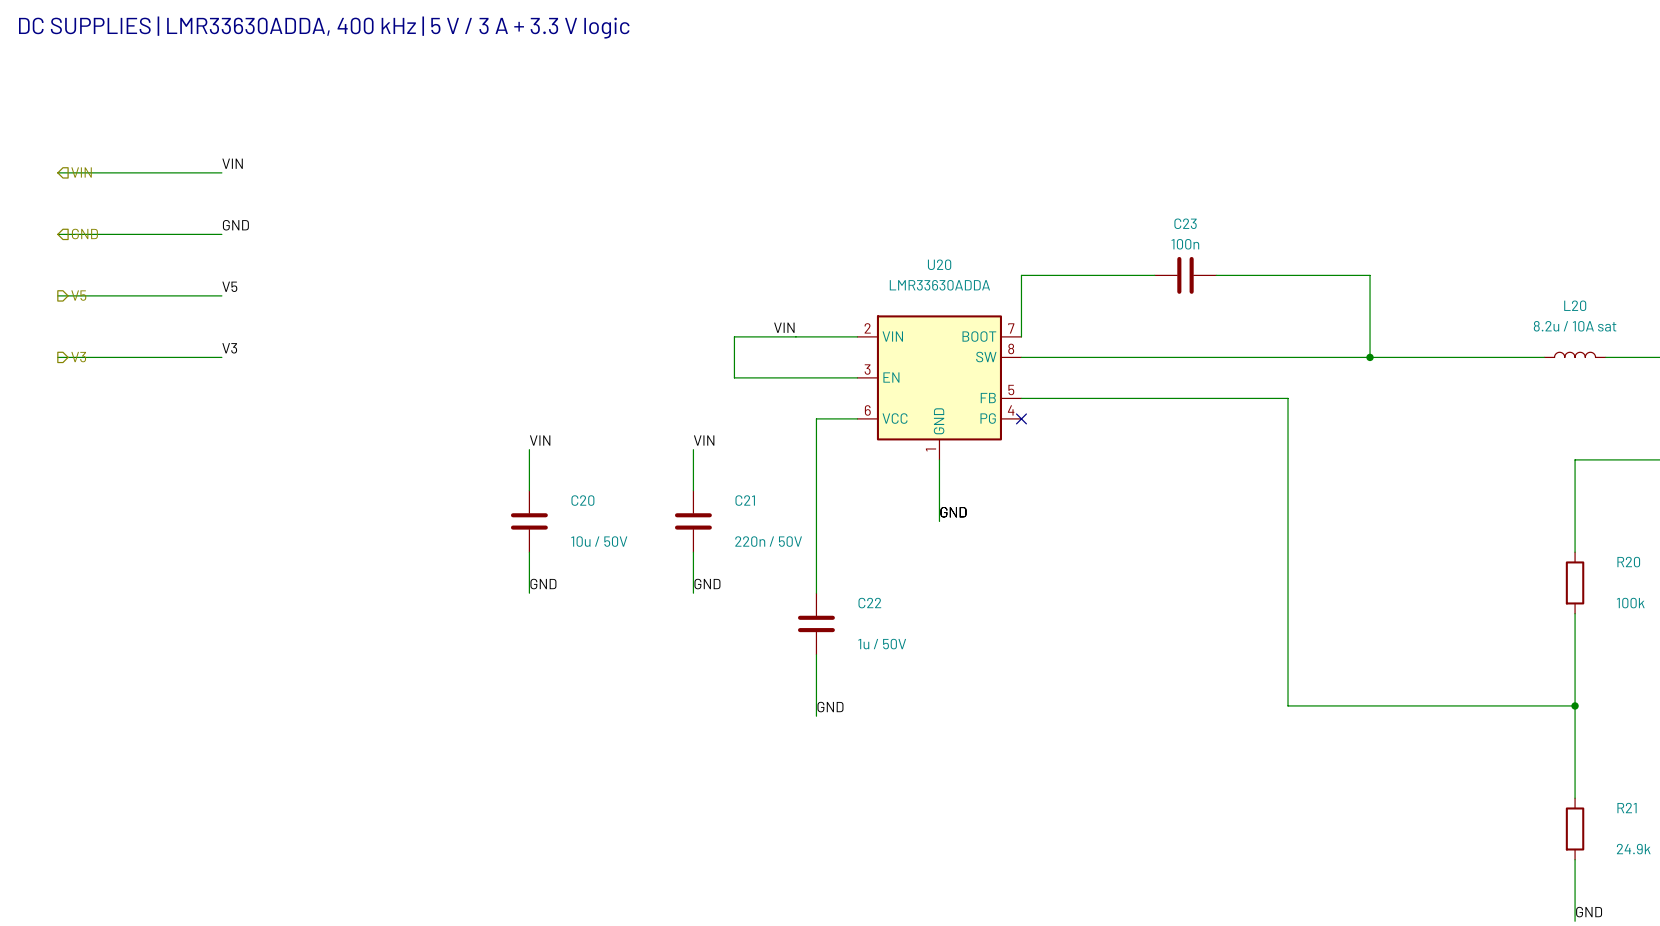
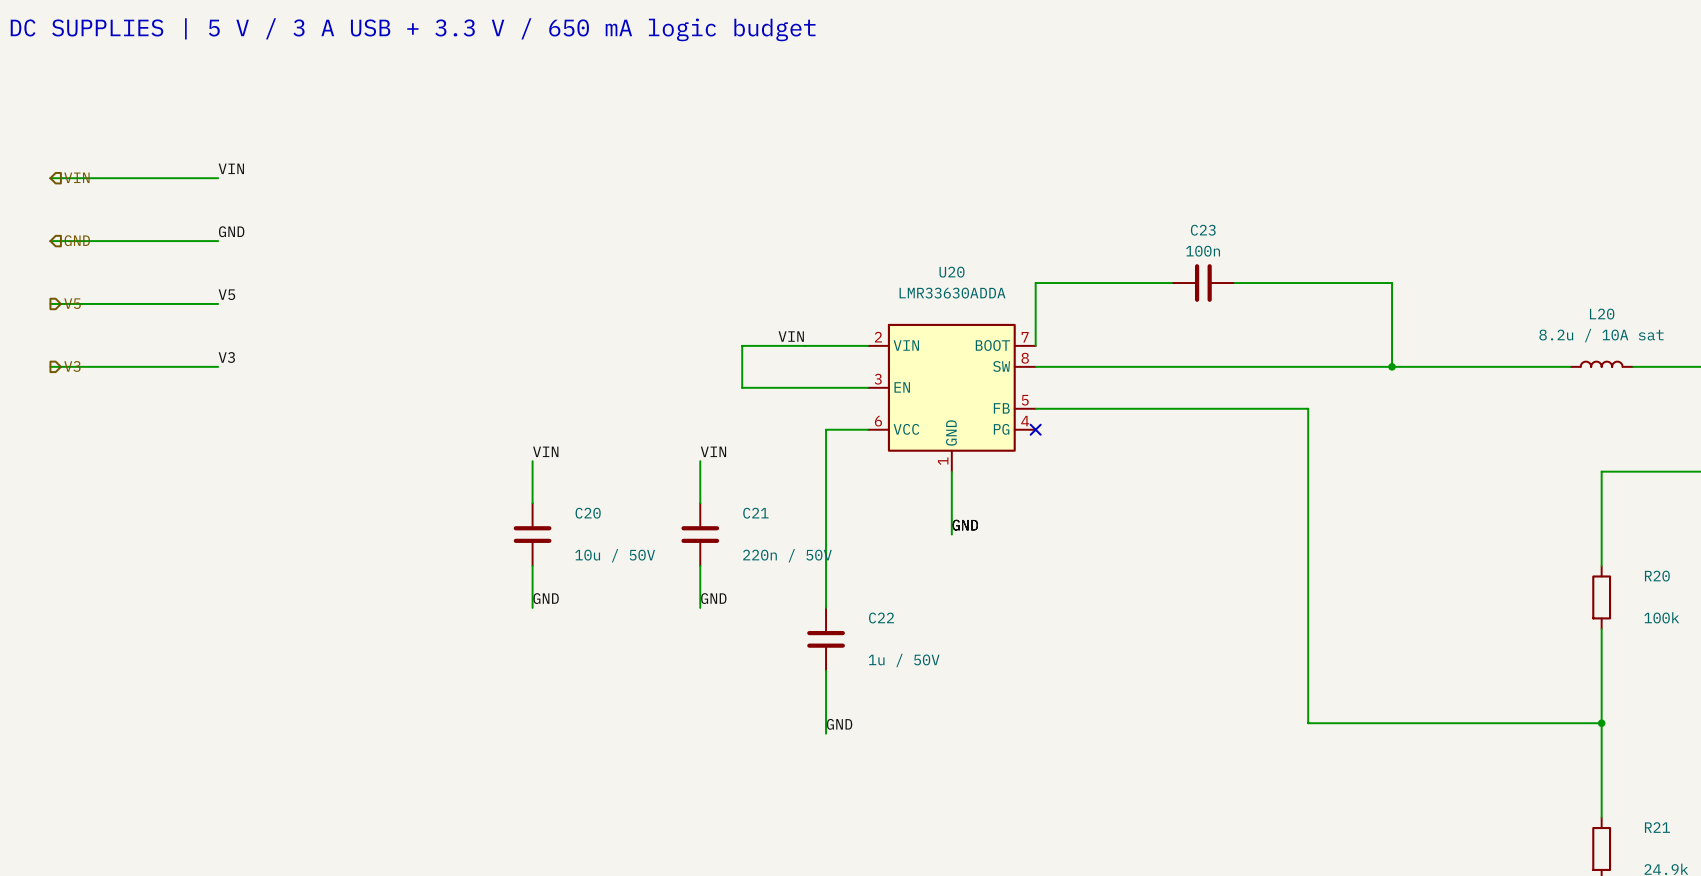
text: DC SUPPLIES | LMR33630ADDA, 400 kHz | 5 V / 3 A + 3.3 V logic (324, 27) -> DC SUPPLIES | 5 V / 3 A USB + 3.3 V / 650 mA logic budget (413, 29)

